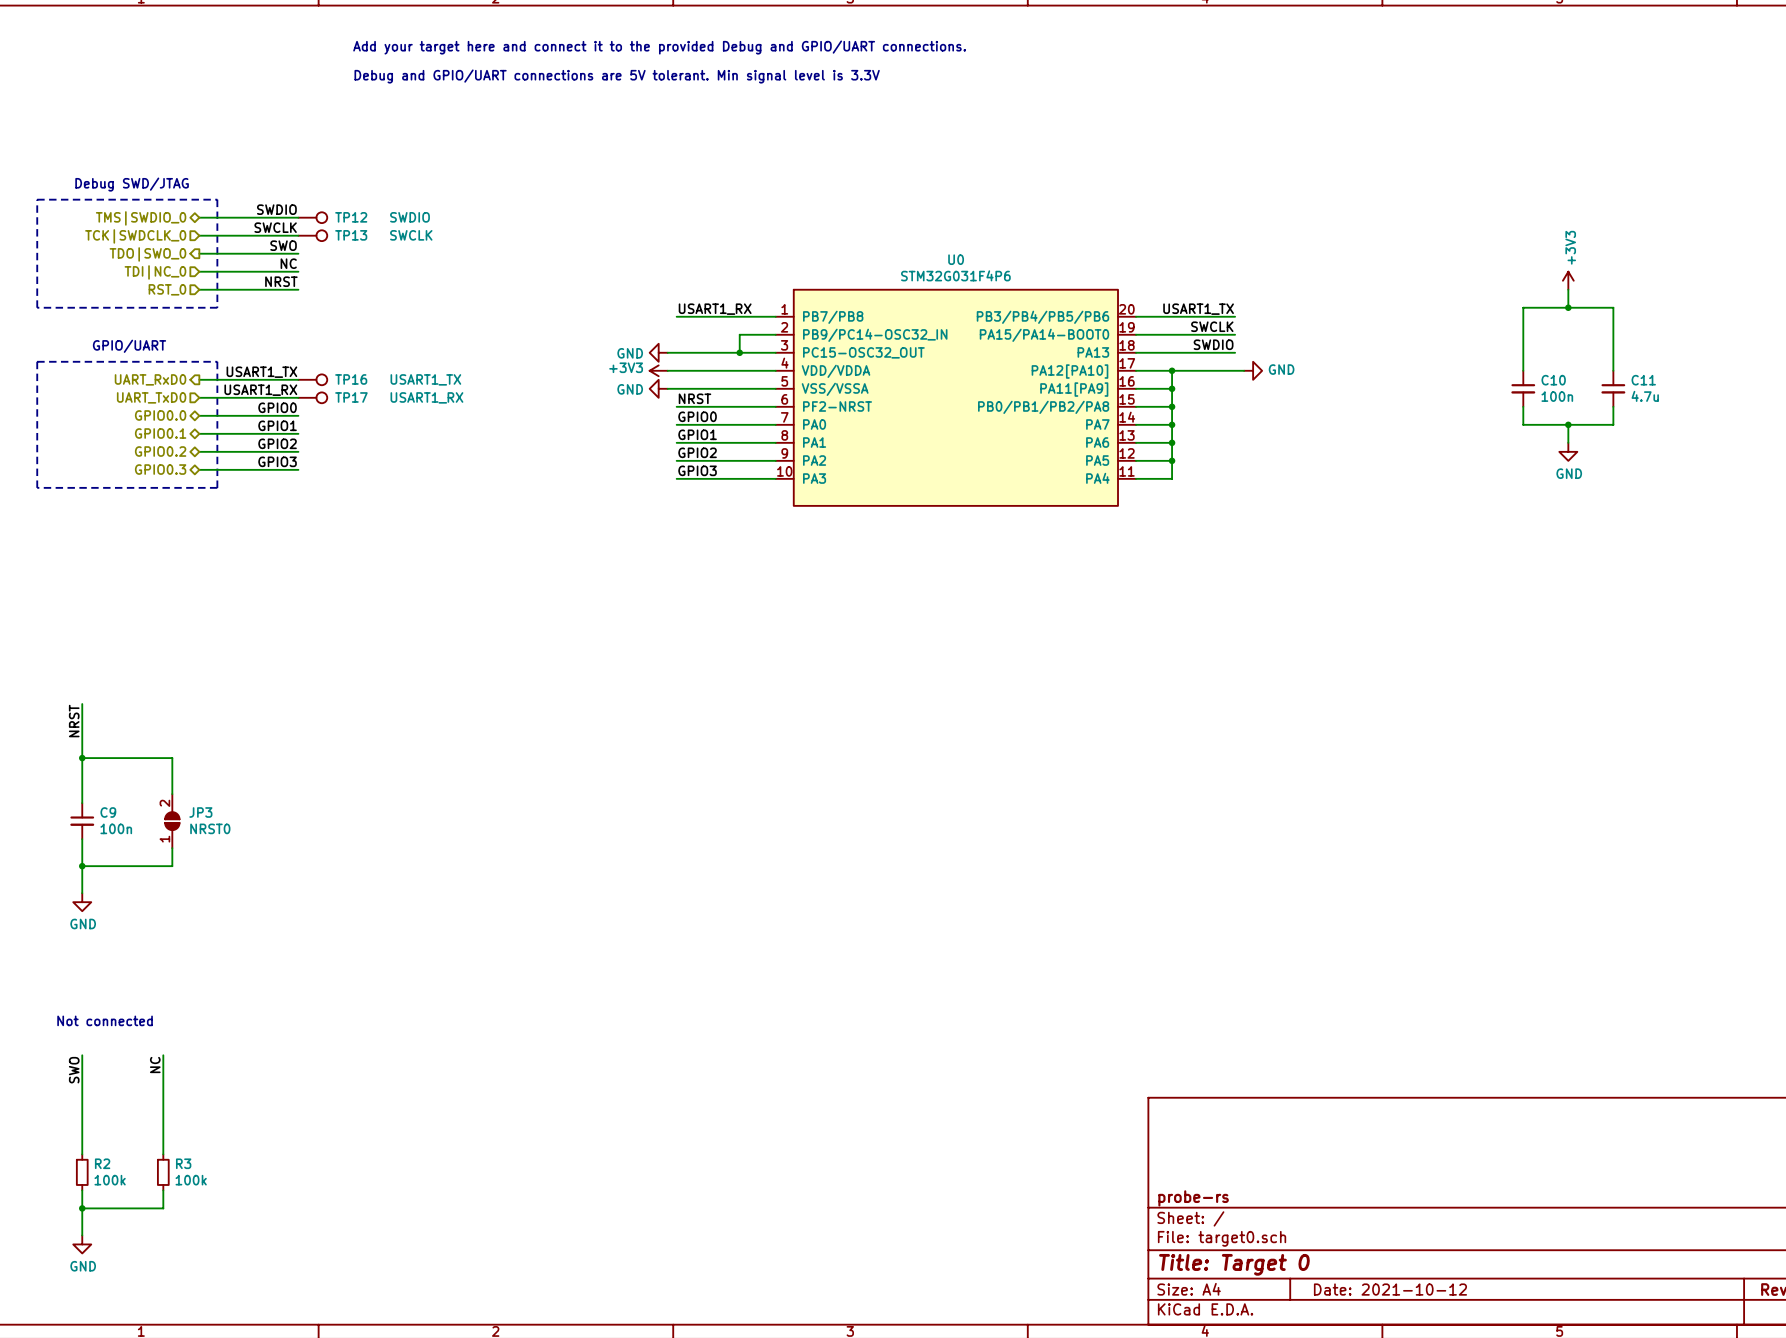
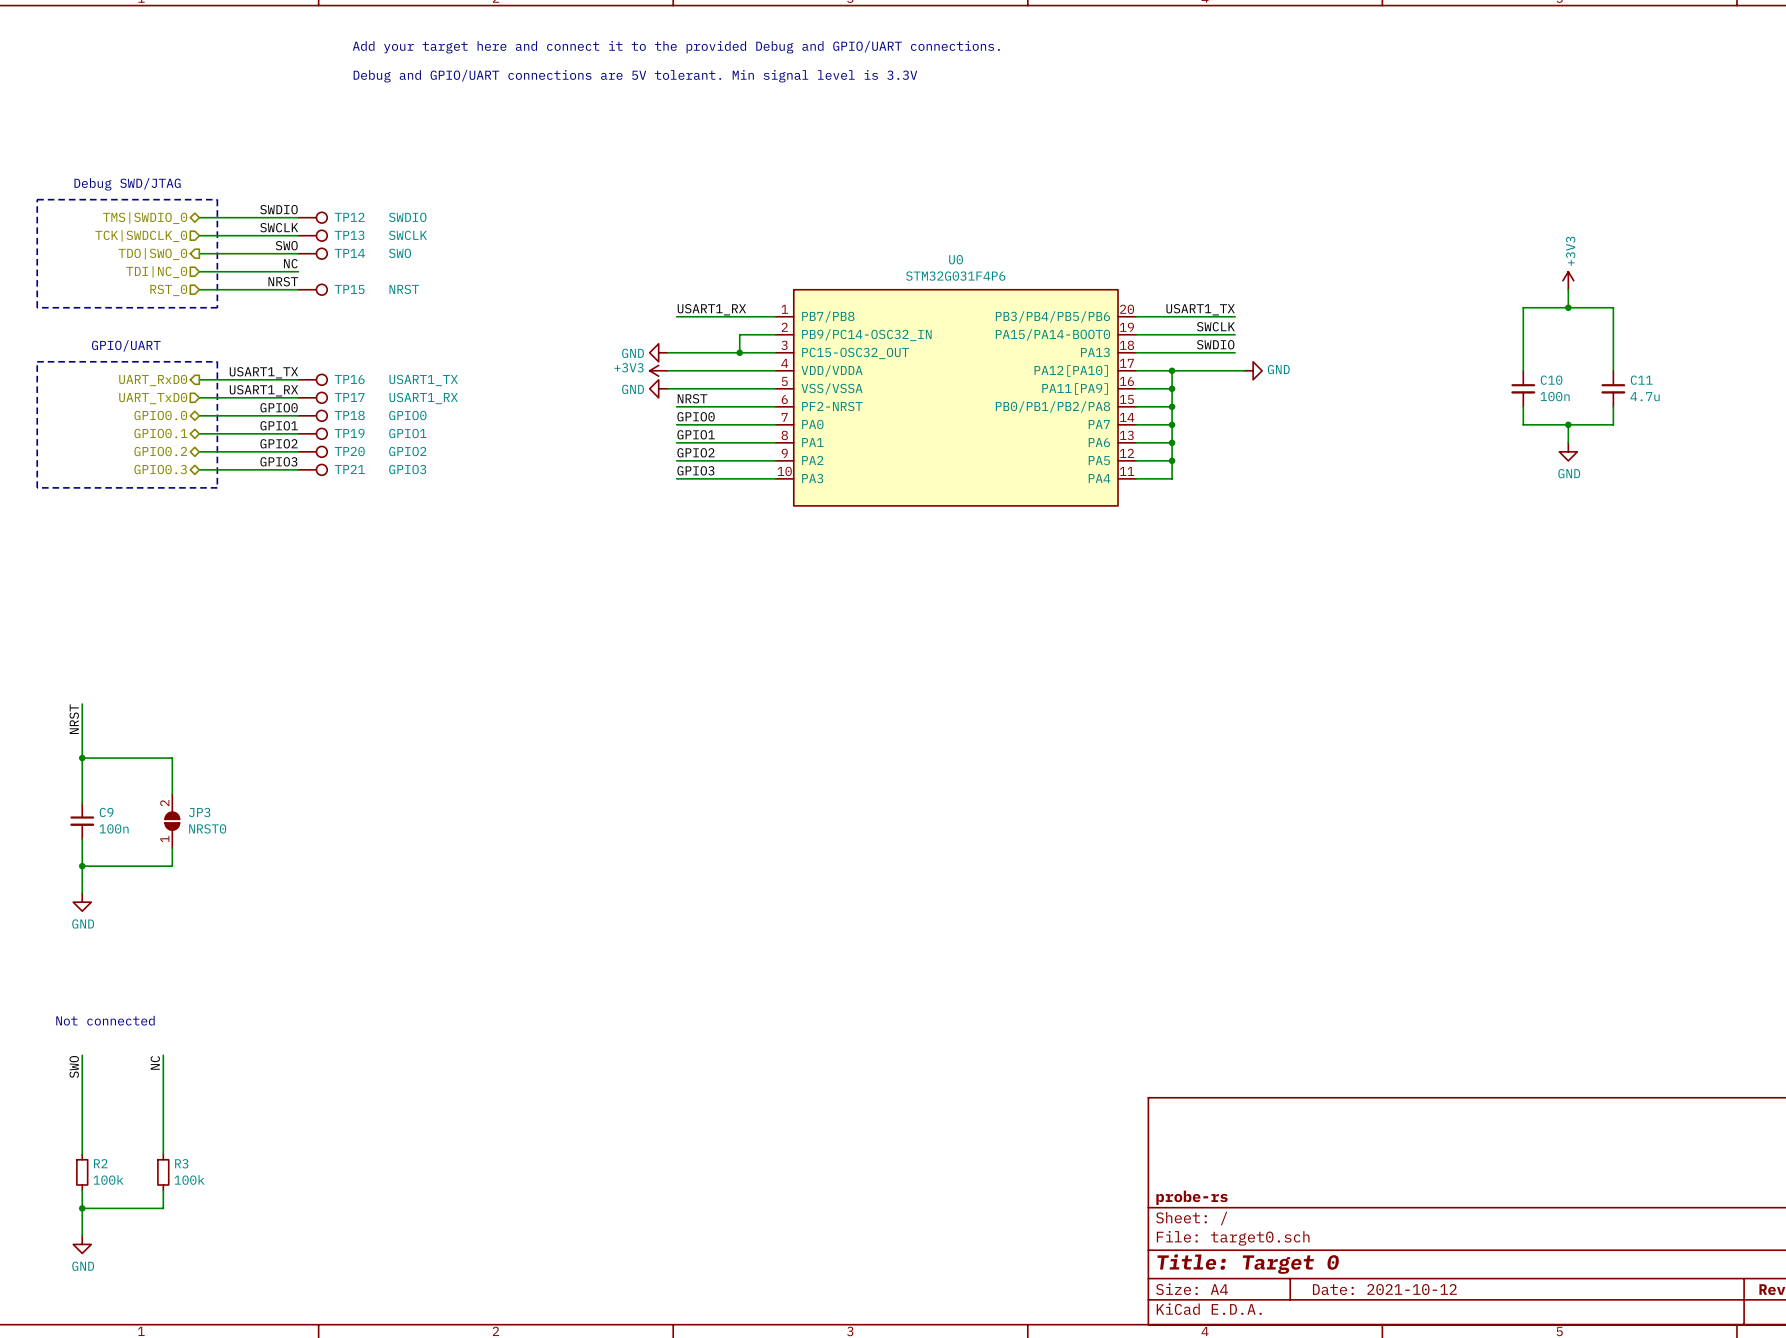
TP14: none -> SWO (312, 253)
TP15: none -> NRST (312, 289)
TP18: none -> GPIO0 (312, 415)
TP19: none -> GPIO1 (312, 433)
TP20: none -> GPIO2 (312, 451)
TP21: none -> GPIO3 (312, 469)

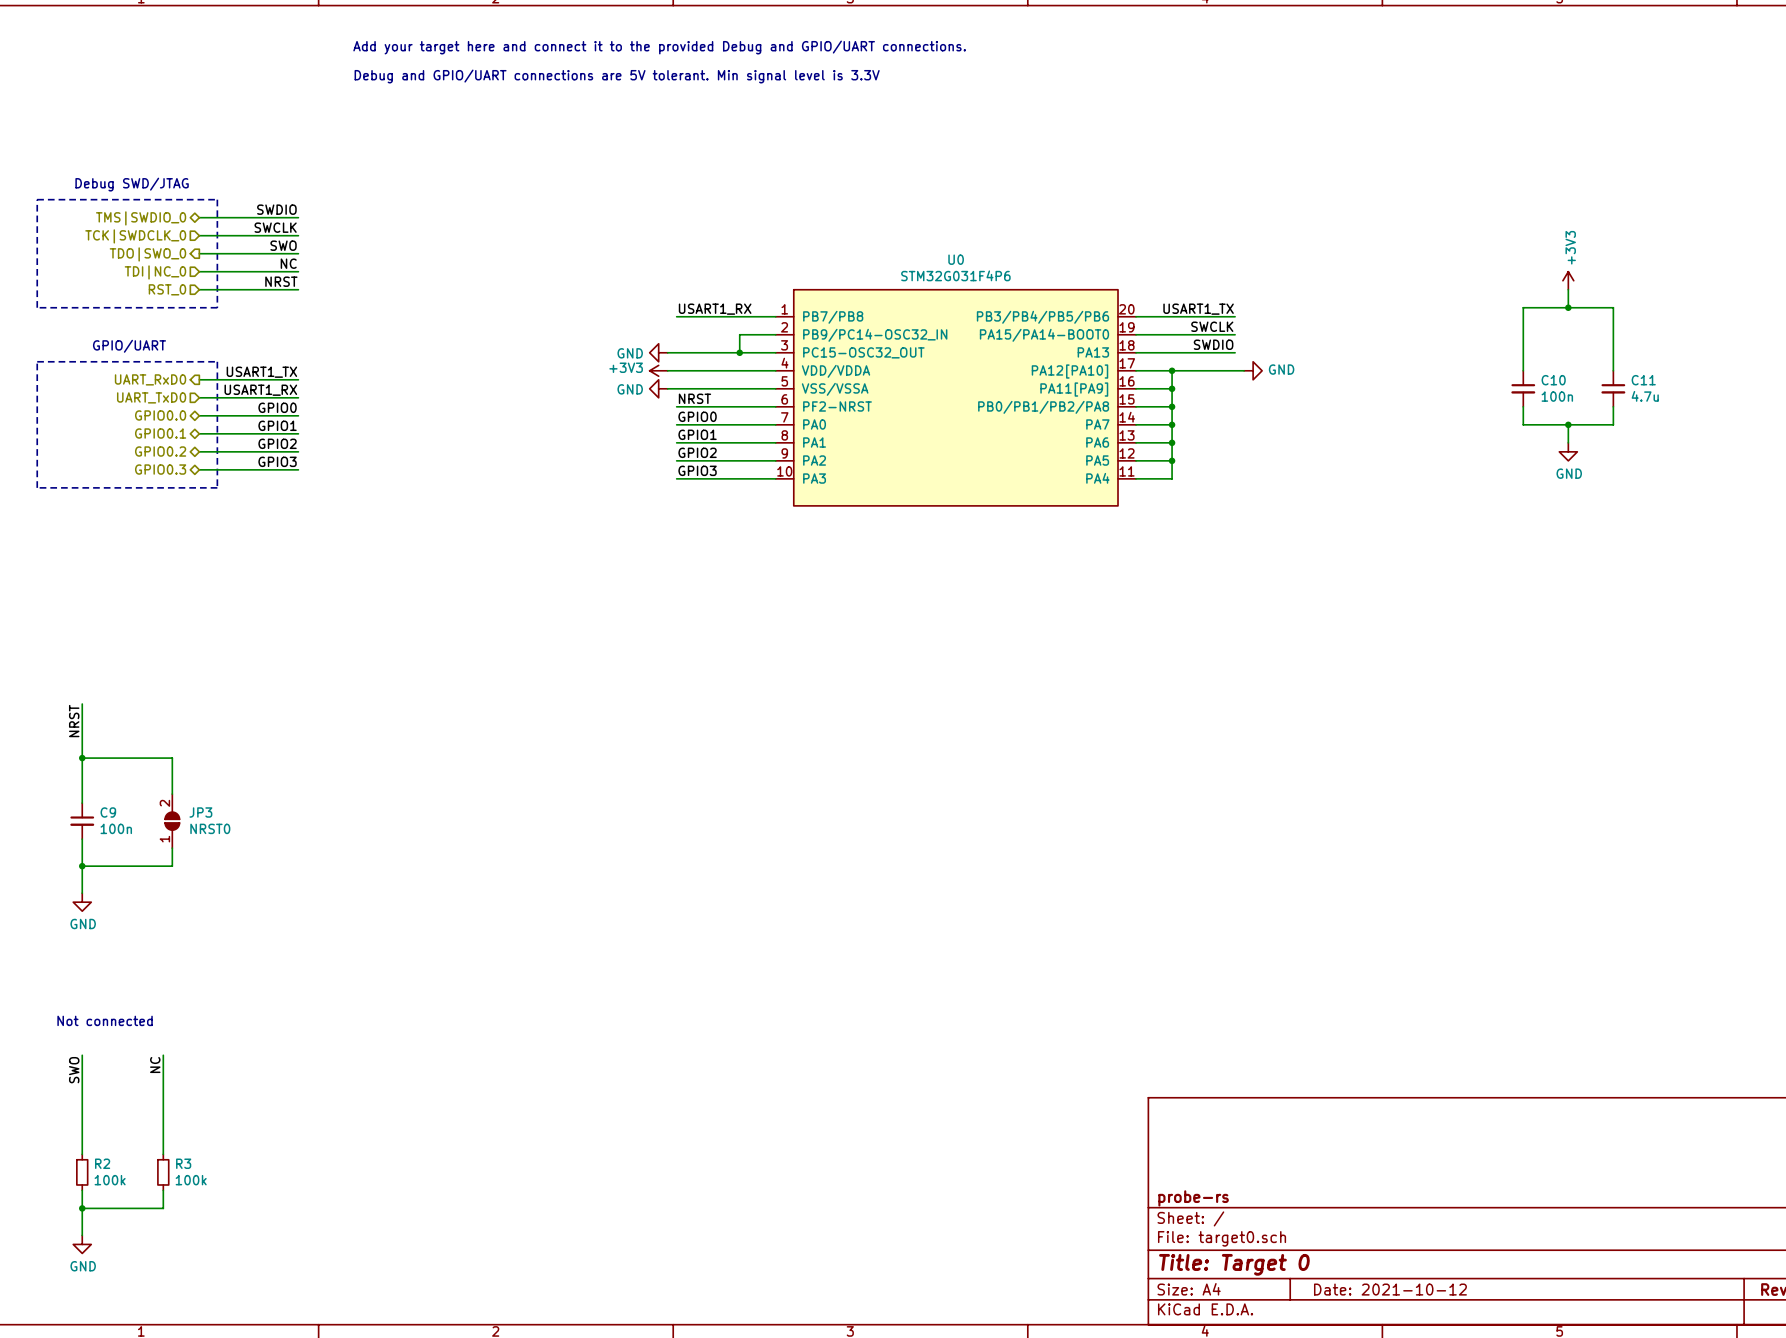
TP12: SWDIO (312, 217) -> none
TP13: SWCLK (312, 235) -> none
TP14: SWO (312, 253) -> none
TP15: NRST (312, 289) -> none
TP16: USART1_TX (312, 379) -> none
TP17: USART1_RX (312, 397) -> none
TP18: GPIO0 (312, 415) -> none
TP19: GPIO1 (312, 433) -> none
TP20: GPIO2 (312, 451) -> none
TP21: GPIO3 (312, 469) -> none

